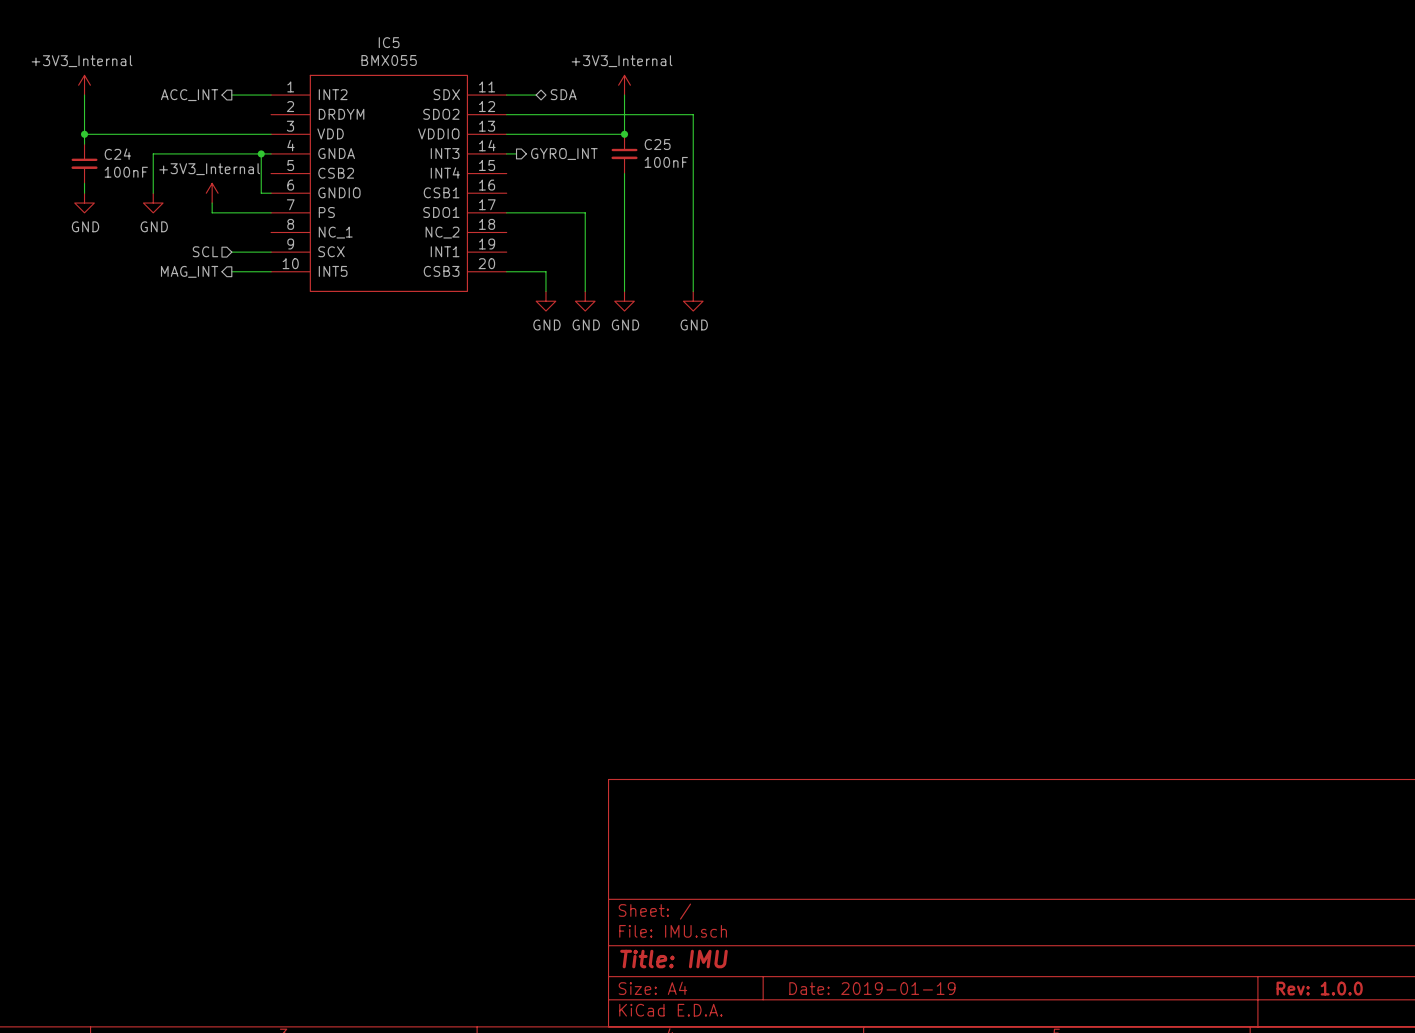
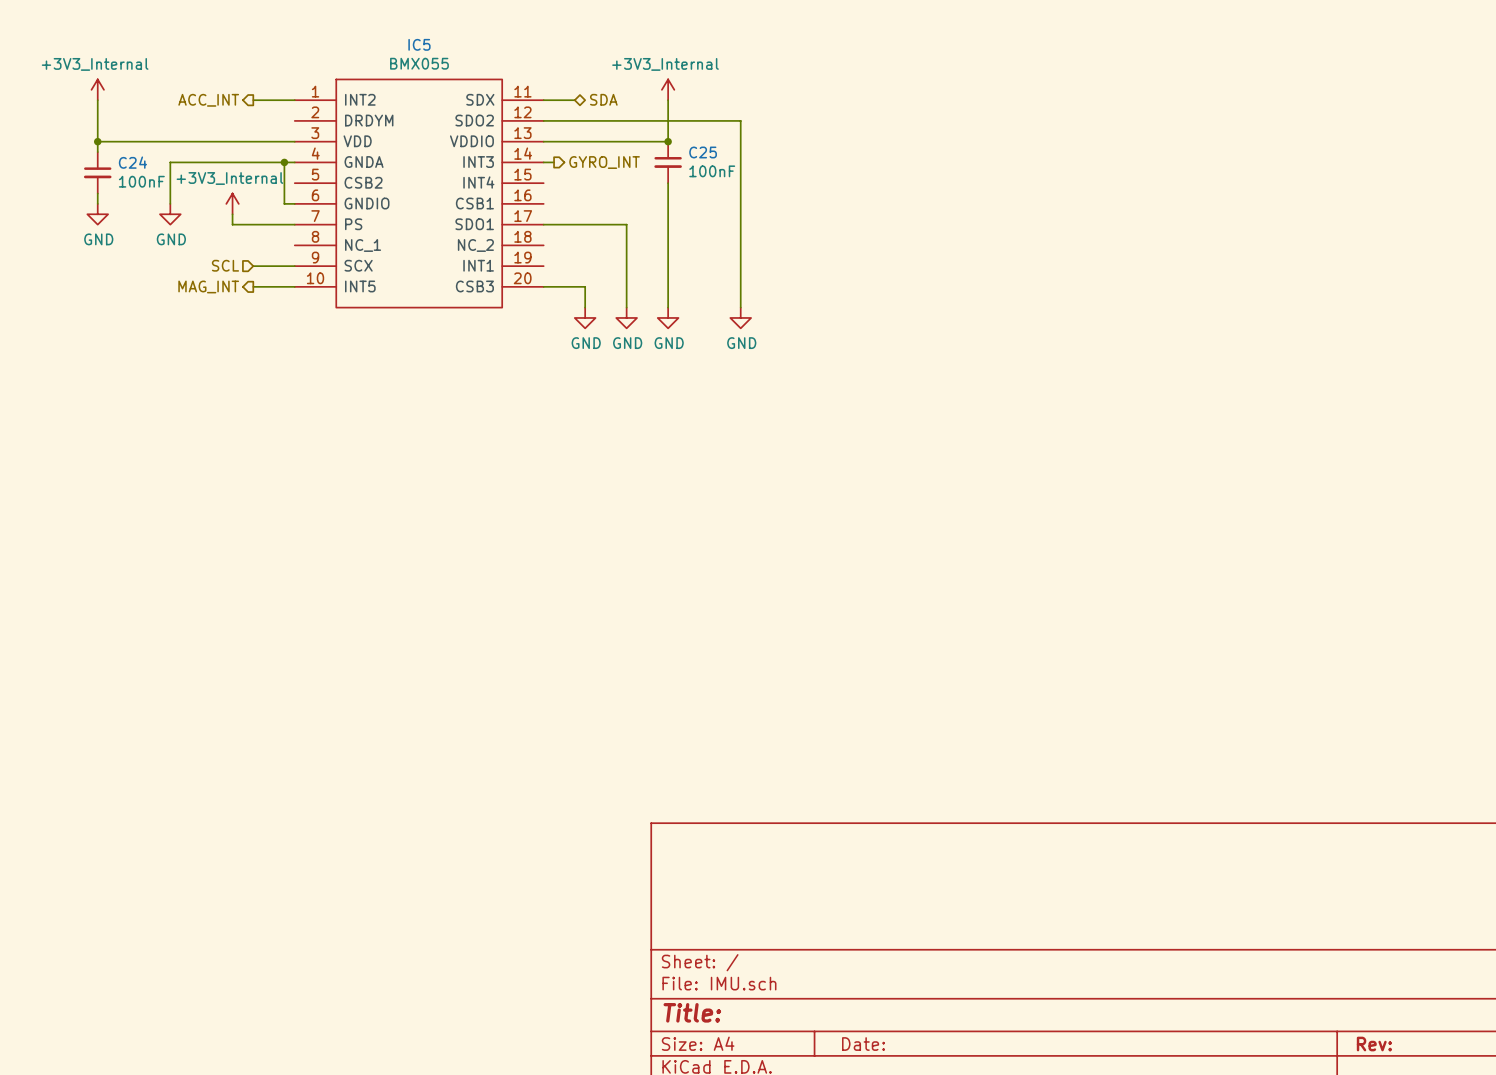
title block: Title: IMU (673, 959) -> Title: (692, 1012)
title block: Date: 2019-01-19 (872, 988) -> Date: (863, 1044)
title block: Rev: 1.0.0 (1319, 988) -> Rev: (1374, 1044)

